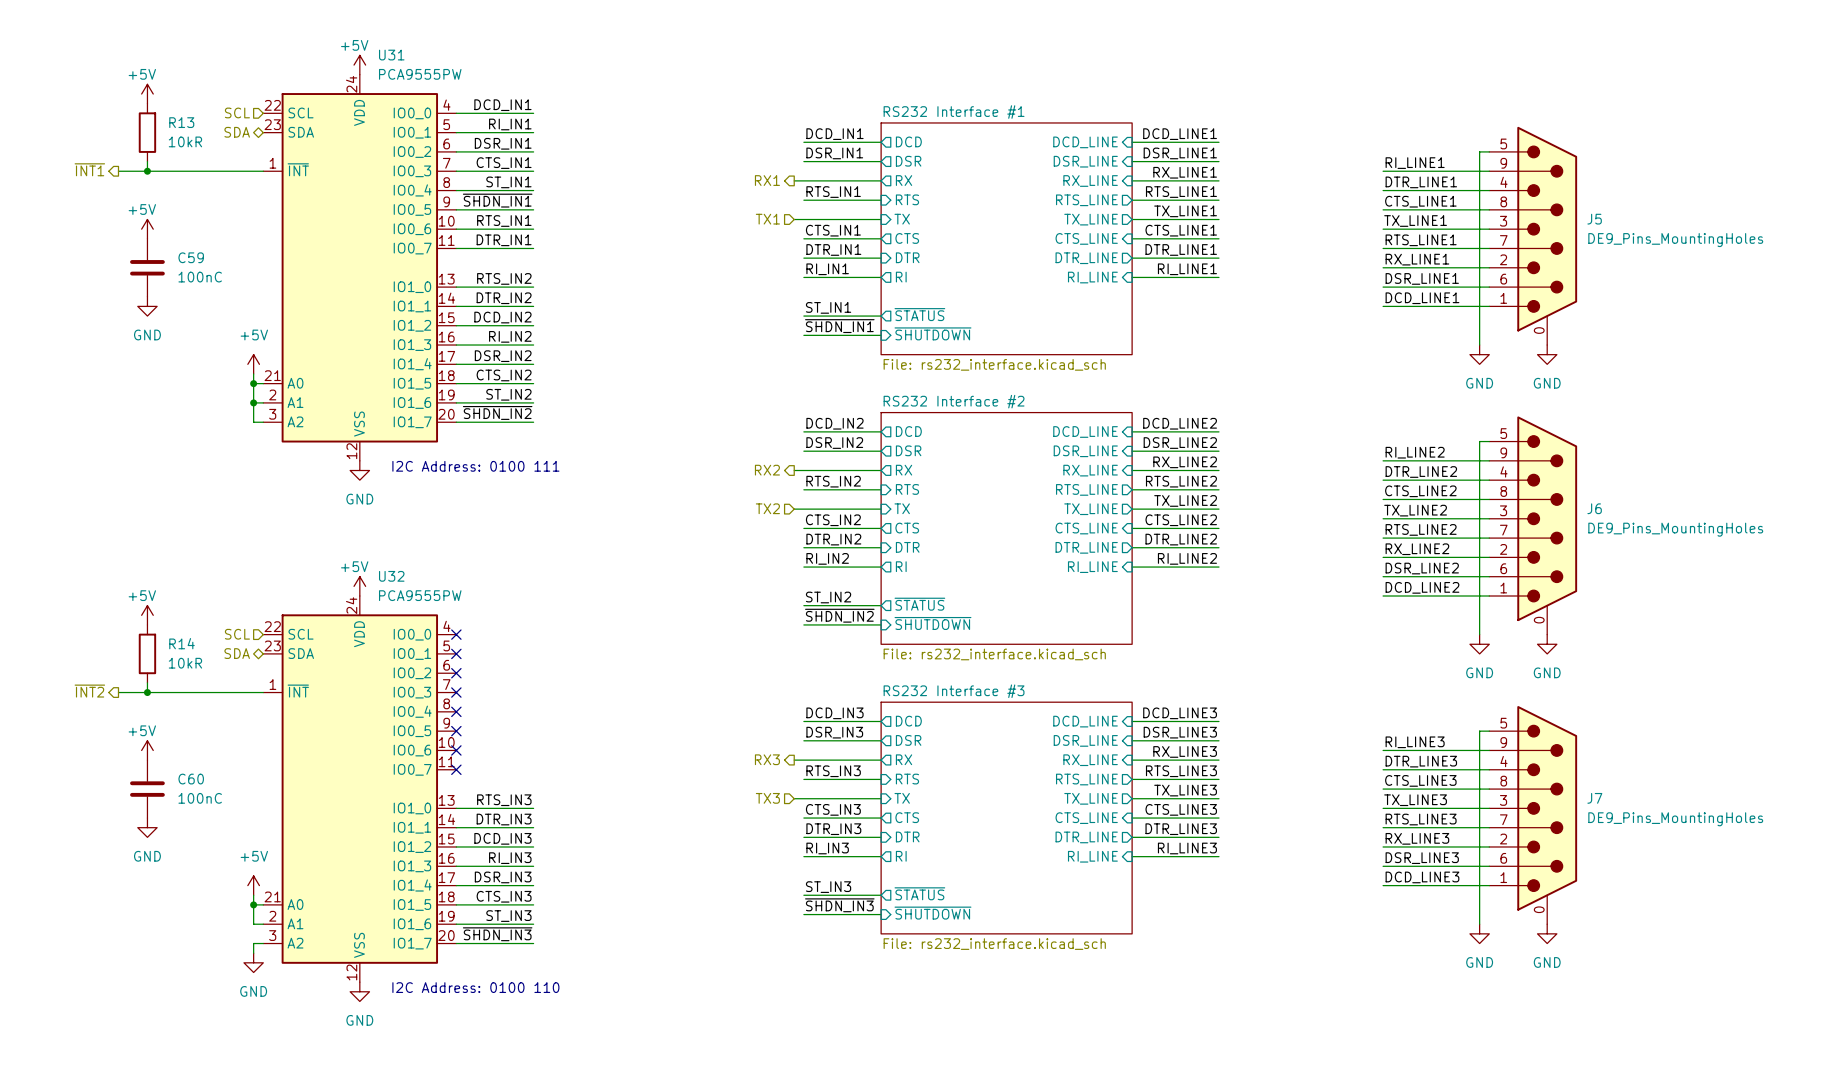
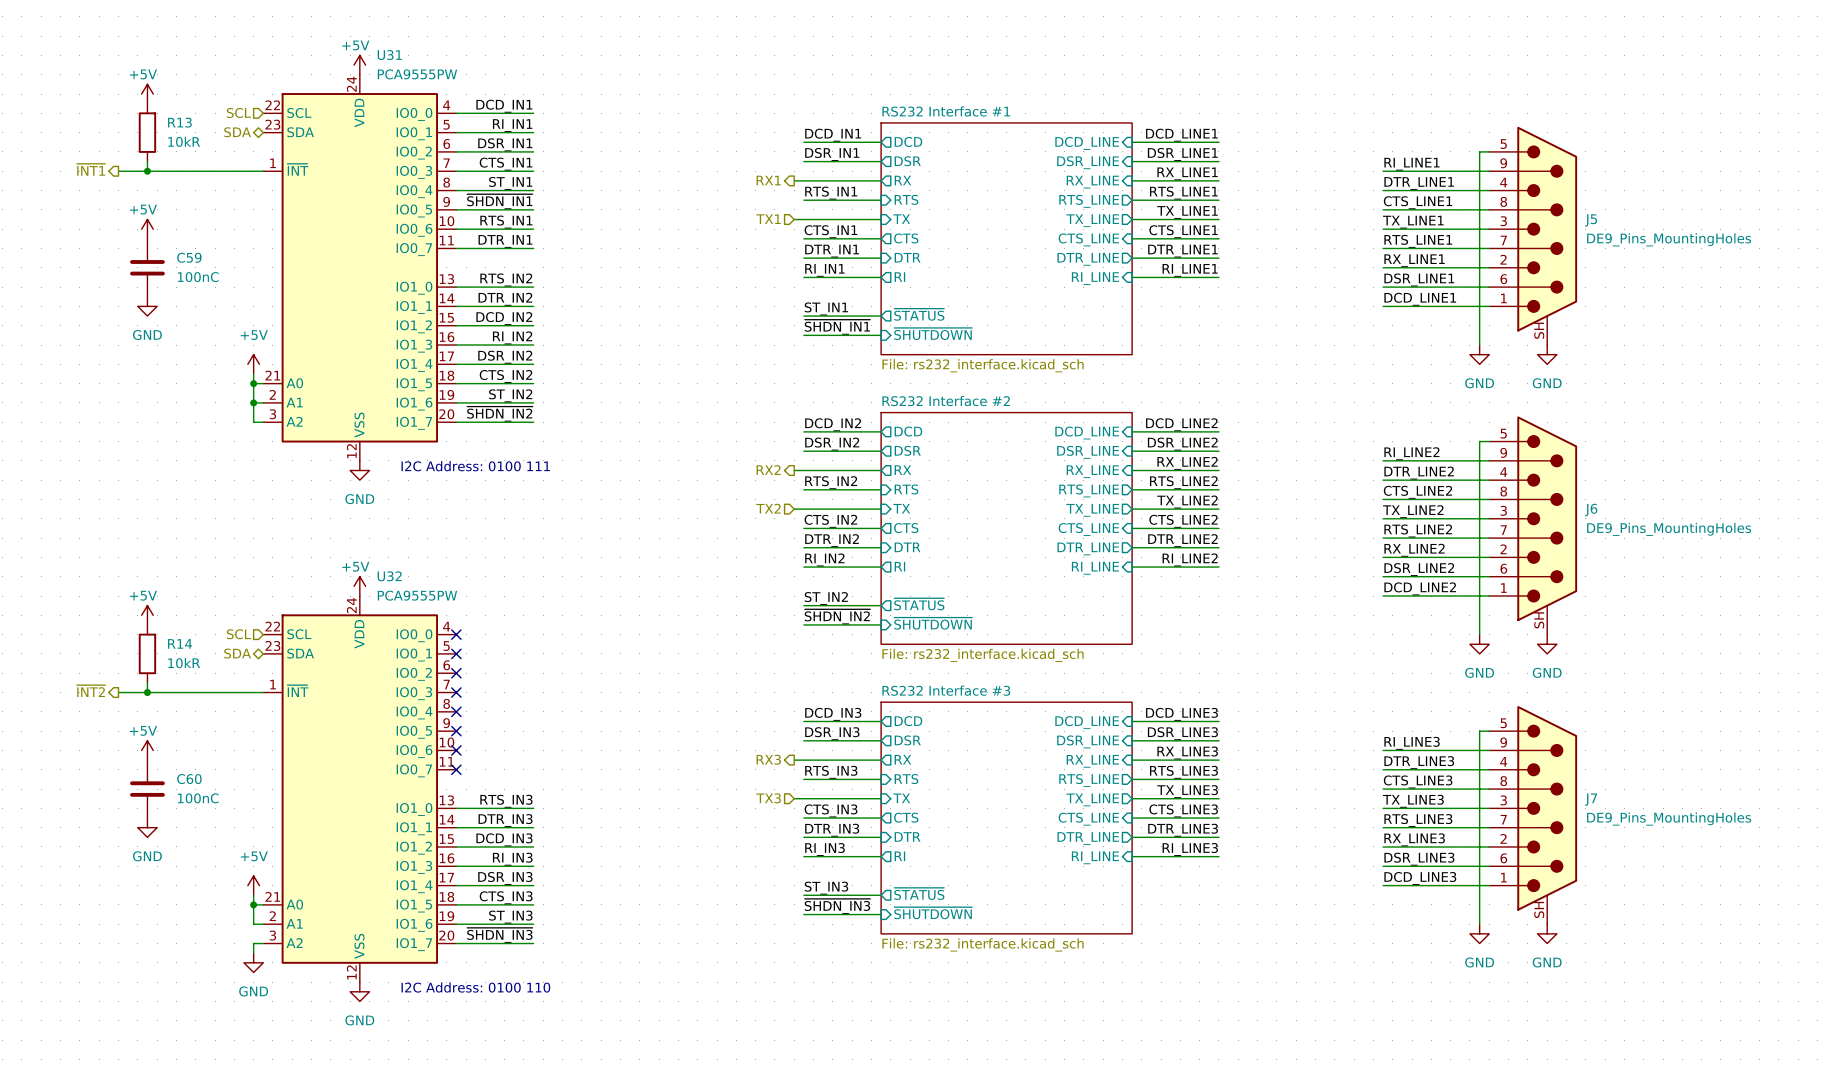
J5 pin number: 0 (1539, 330) -> SH (1539, 330)
J6 pin number: 0 (1539, 620) -> SH (1539, 620)
J7 pin number: 0 (1539, 909) -> SH (1539, 909)

